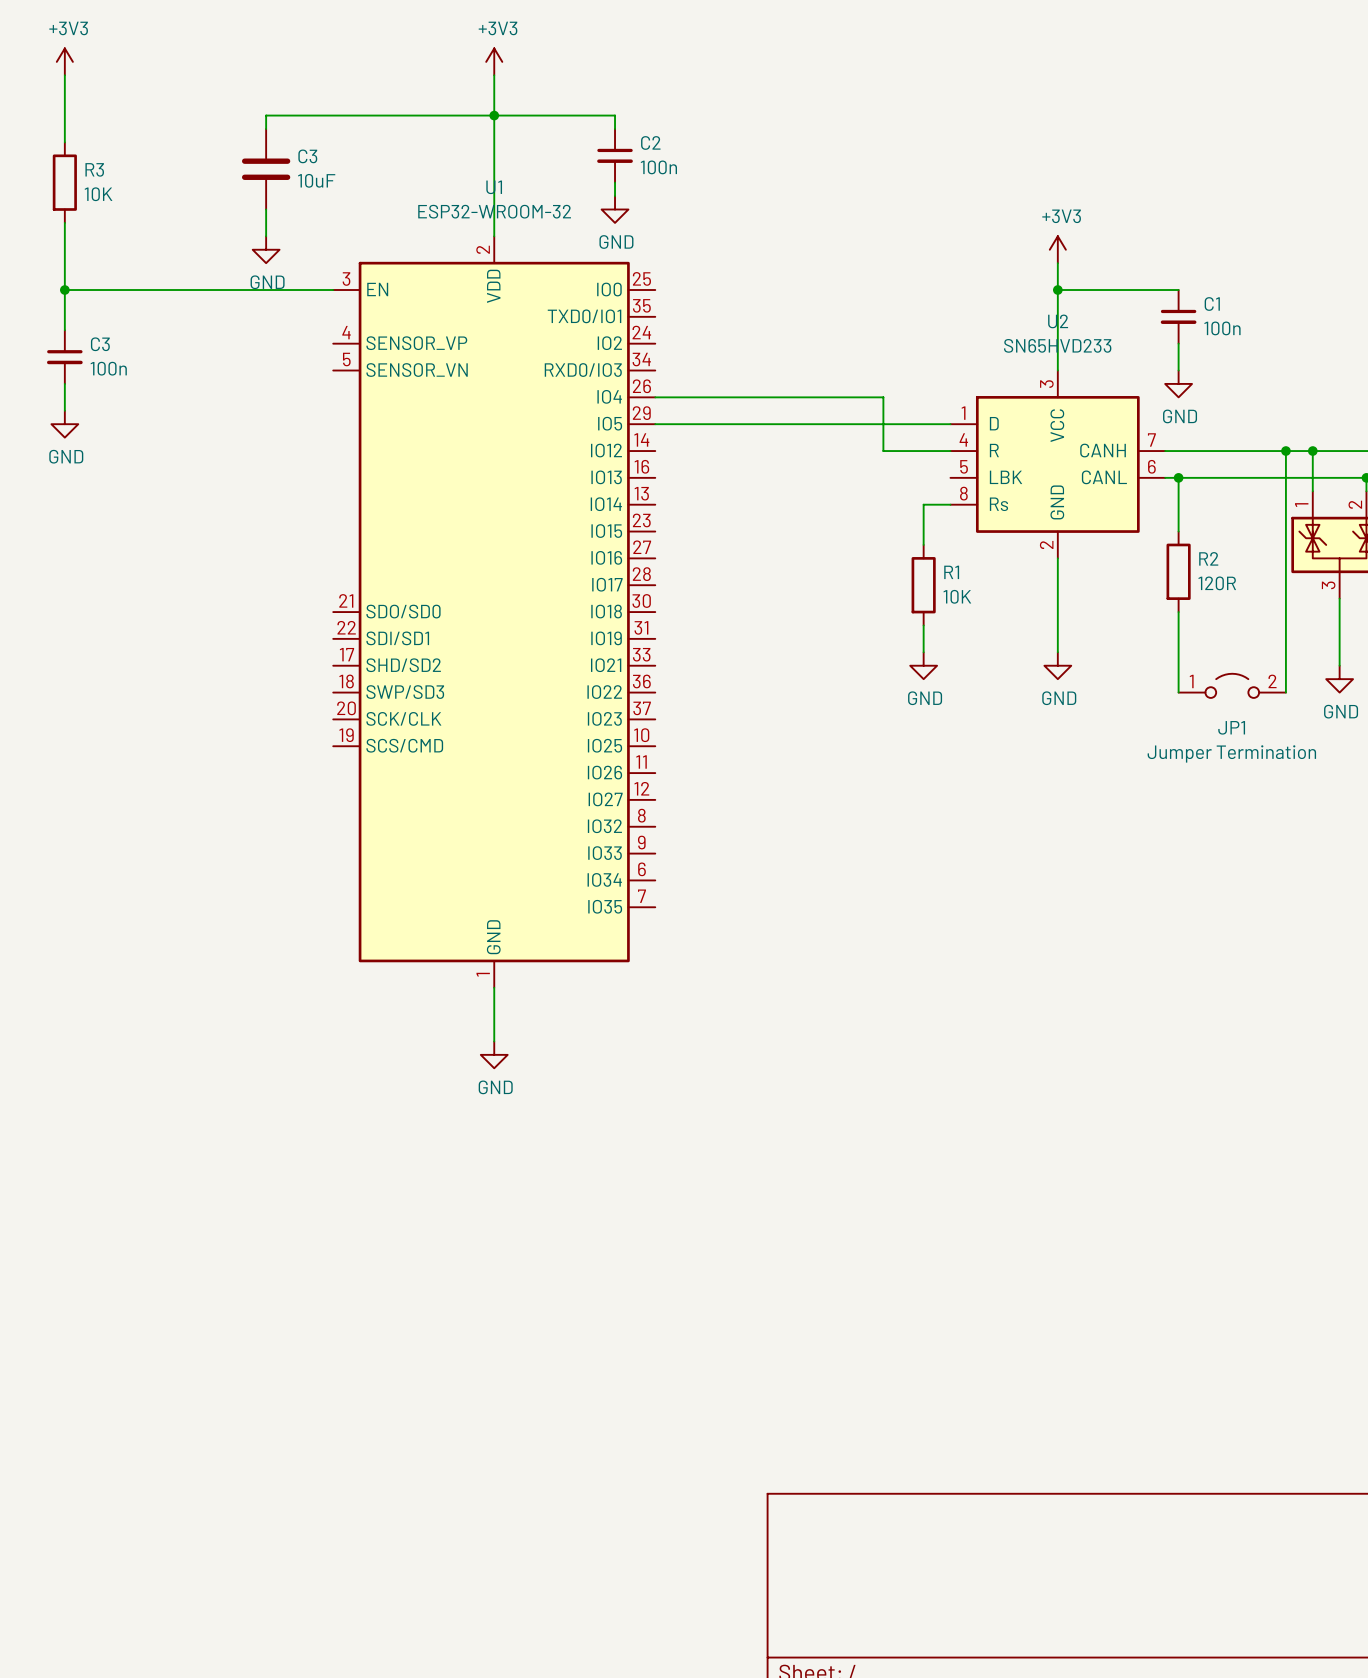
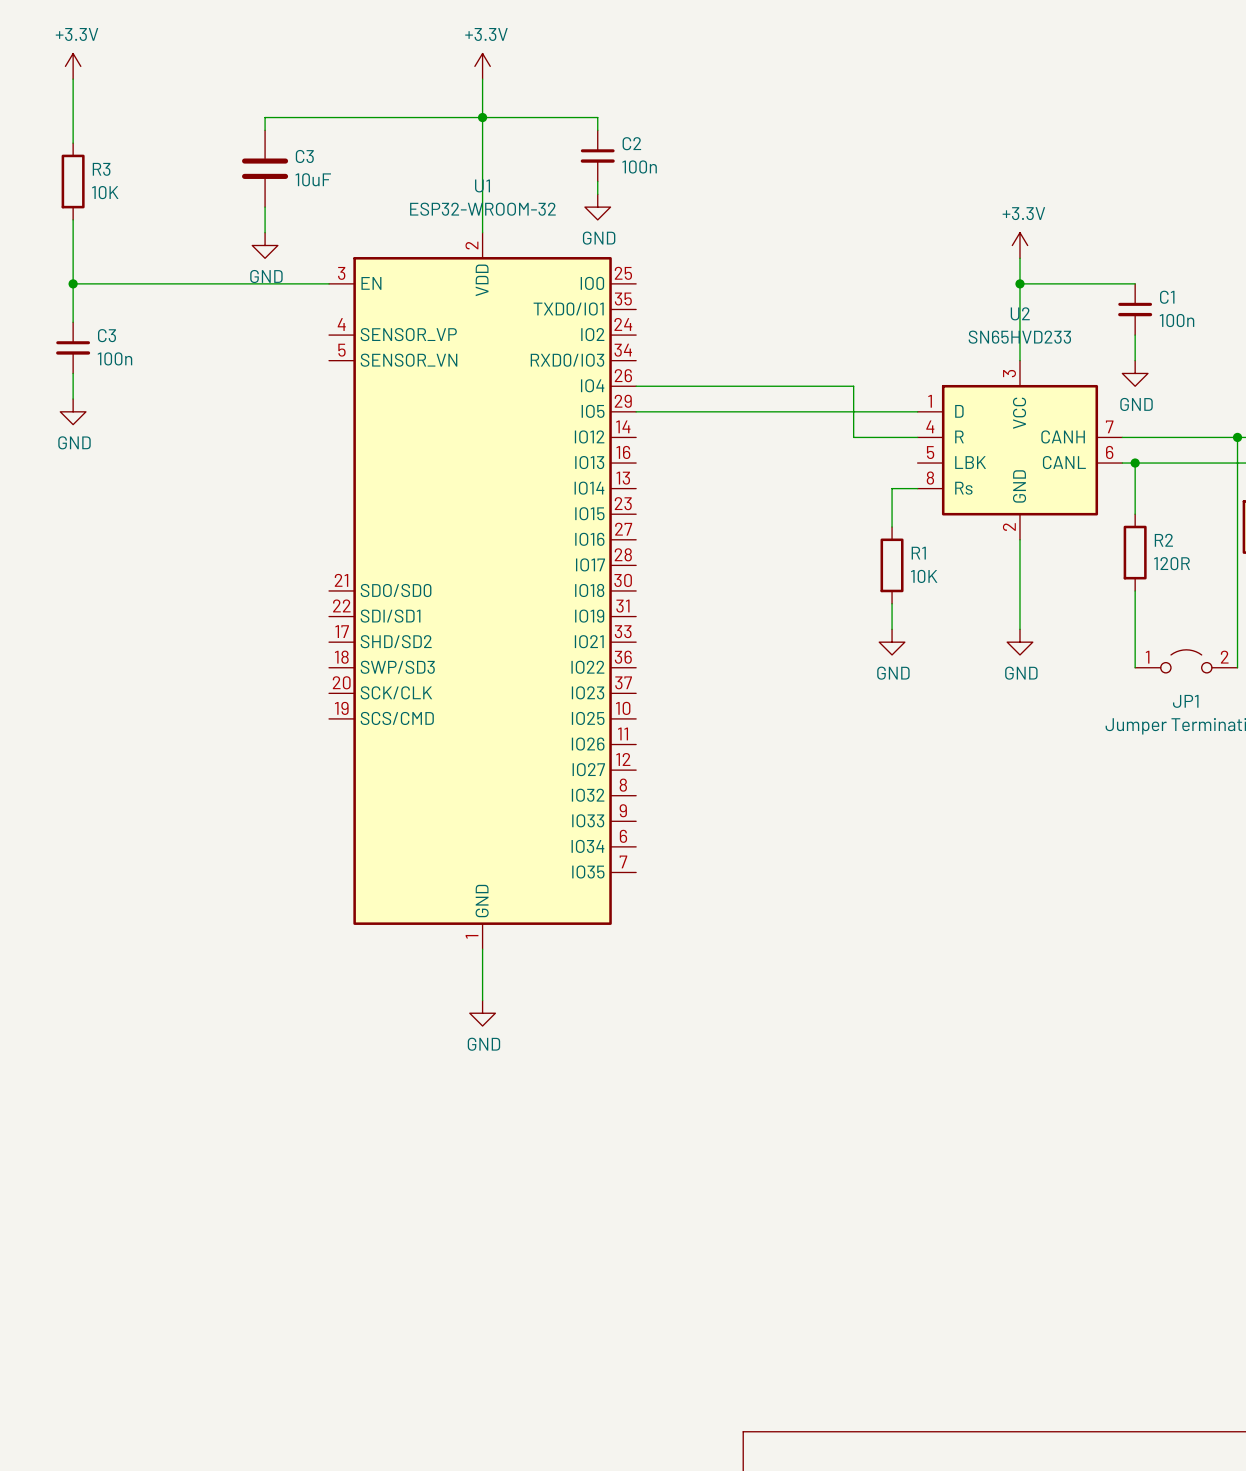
power symbol: +3V3 (64, 61) -> +3.3V (73, 66)
power symbol: +3V3 (494, 61) -> +3.3V (482, 66)
power symbol: +3V3 (1057, 249) -> +3.3V (1019, 245)

